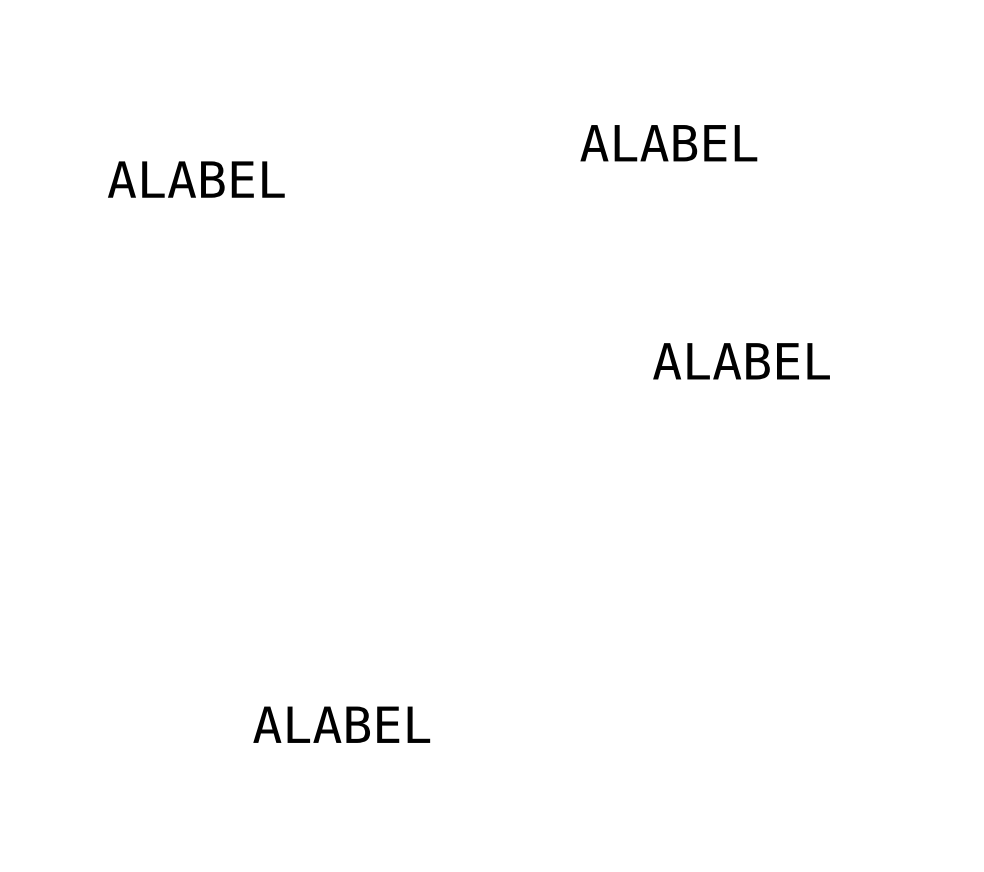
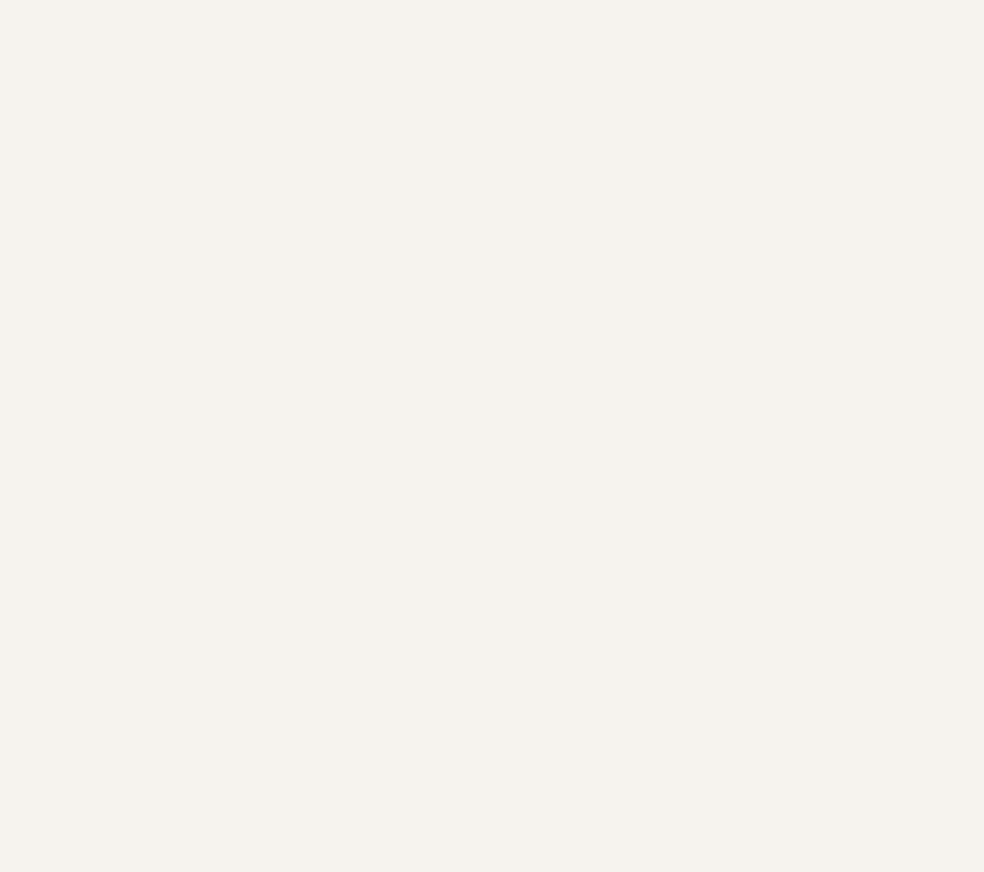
label: ALABEL (668, 143) -> none
label: ALABEL (196, 179) -> none
label: ALABEL (741, 361) -> none
label: ALABEL (341, 724) -> none

